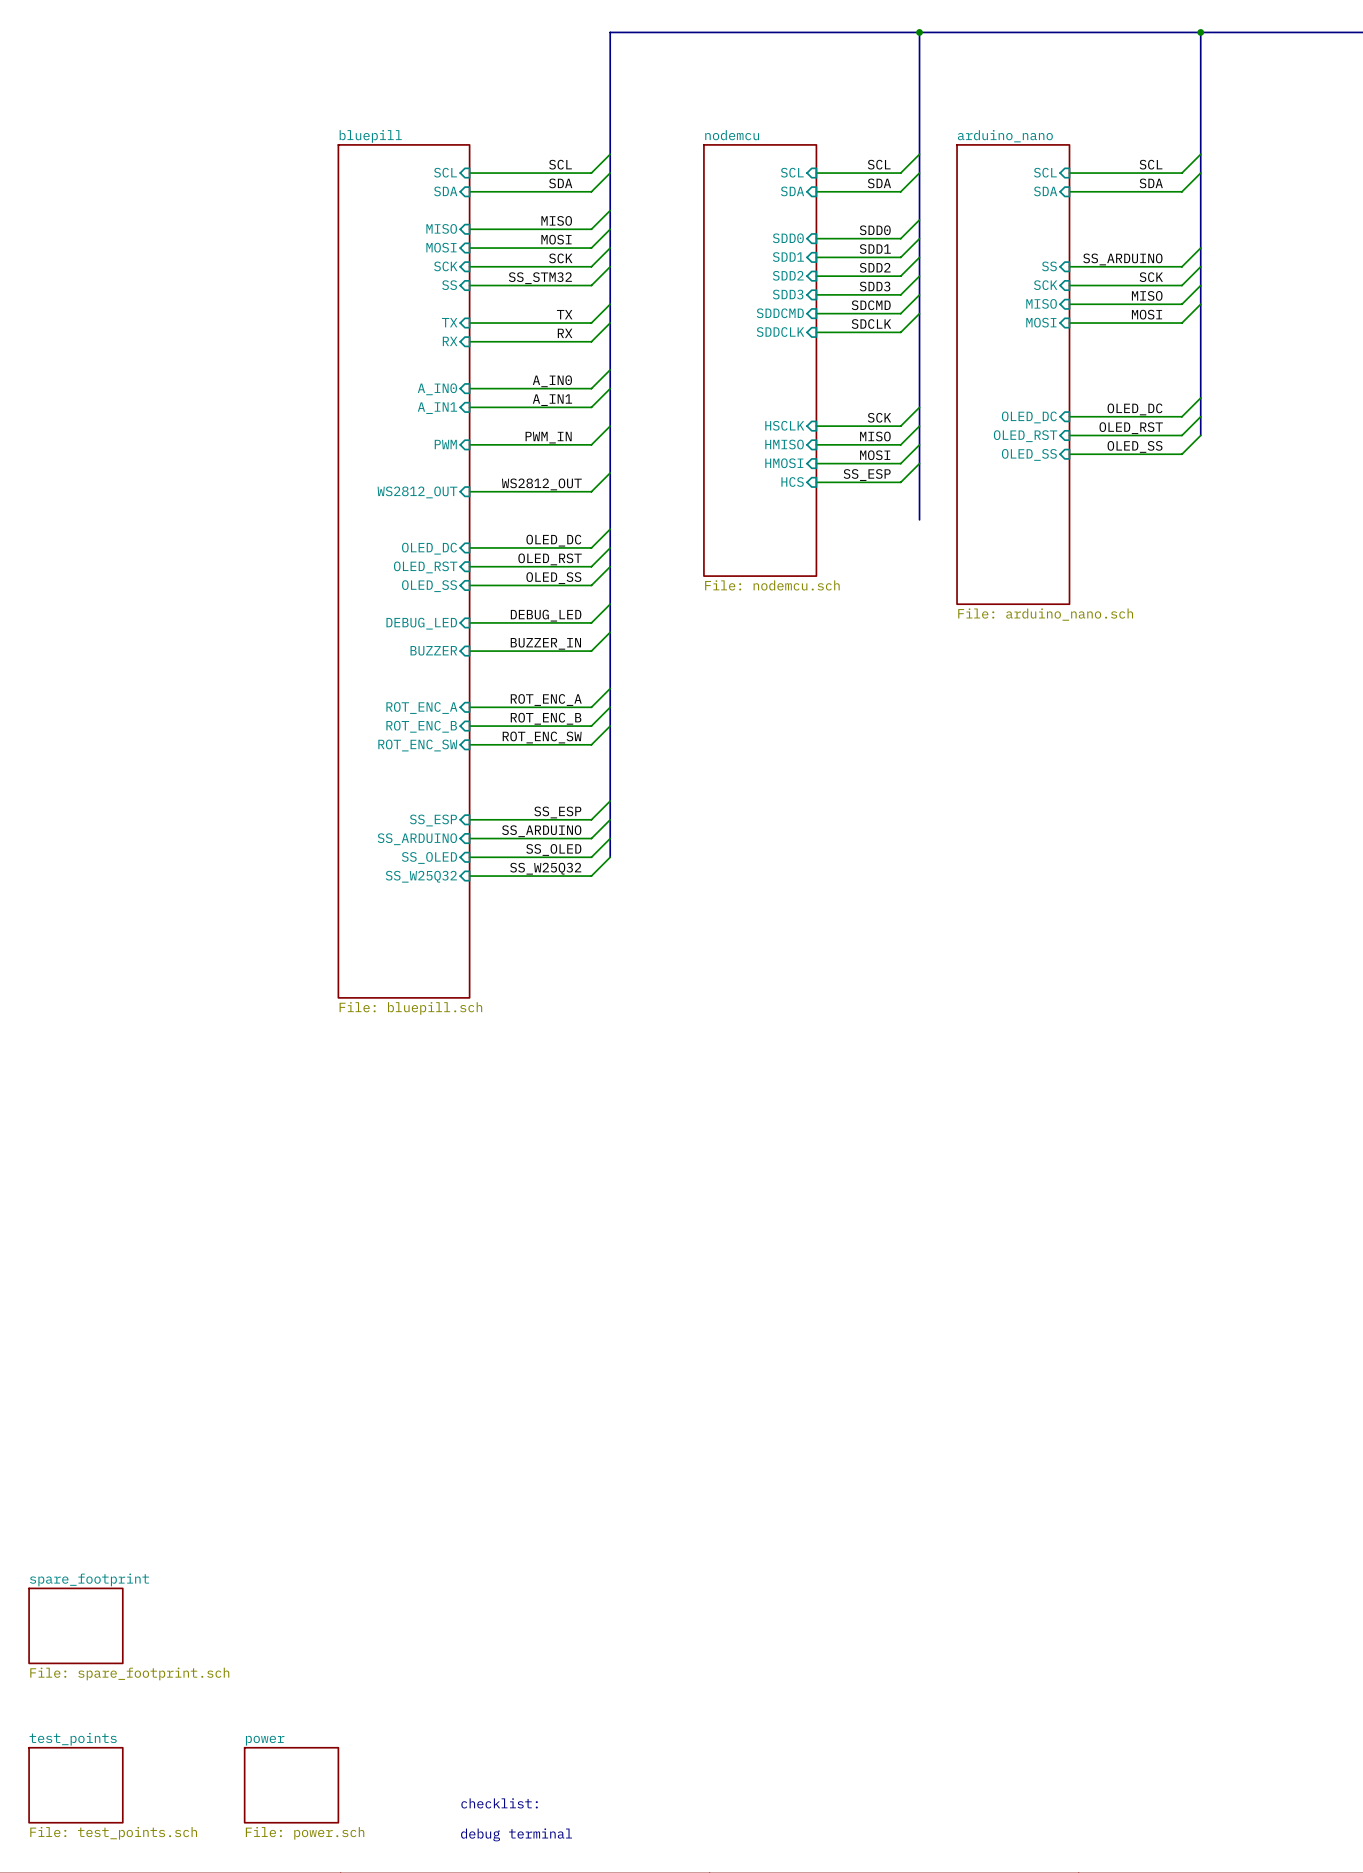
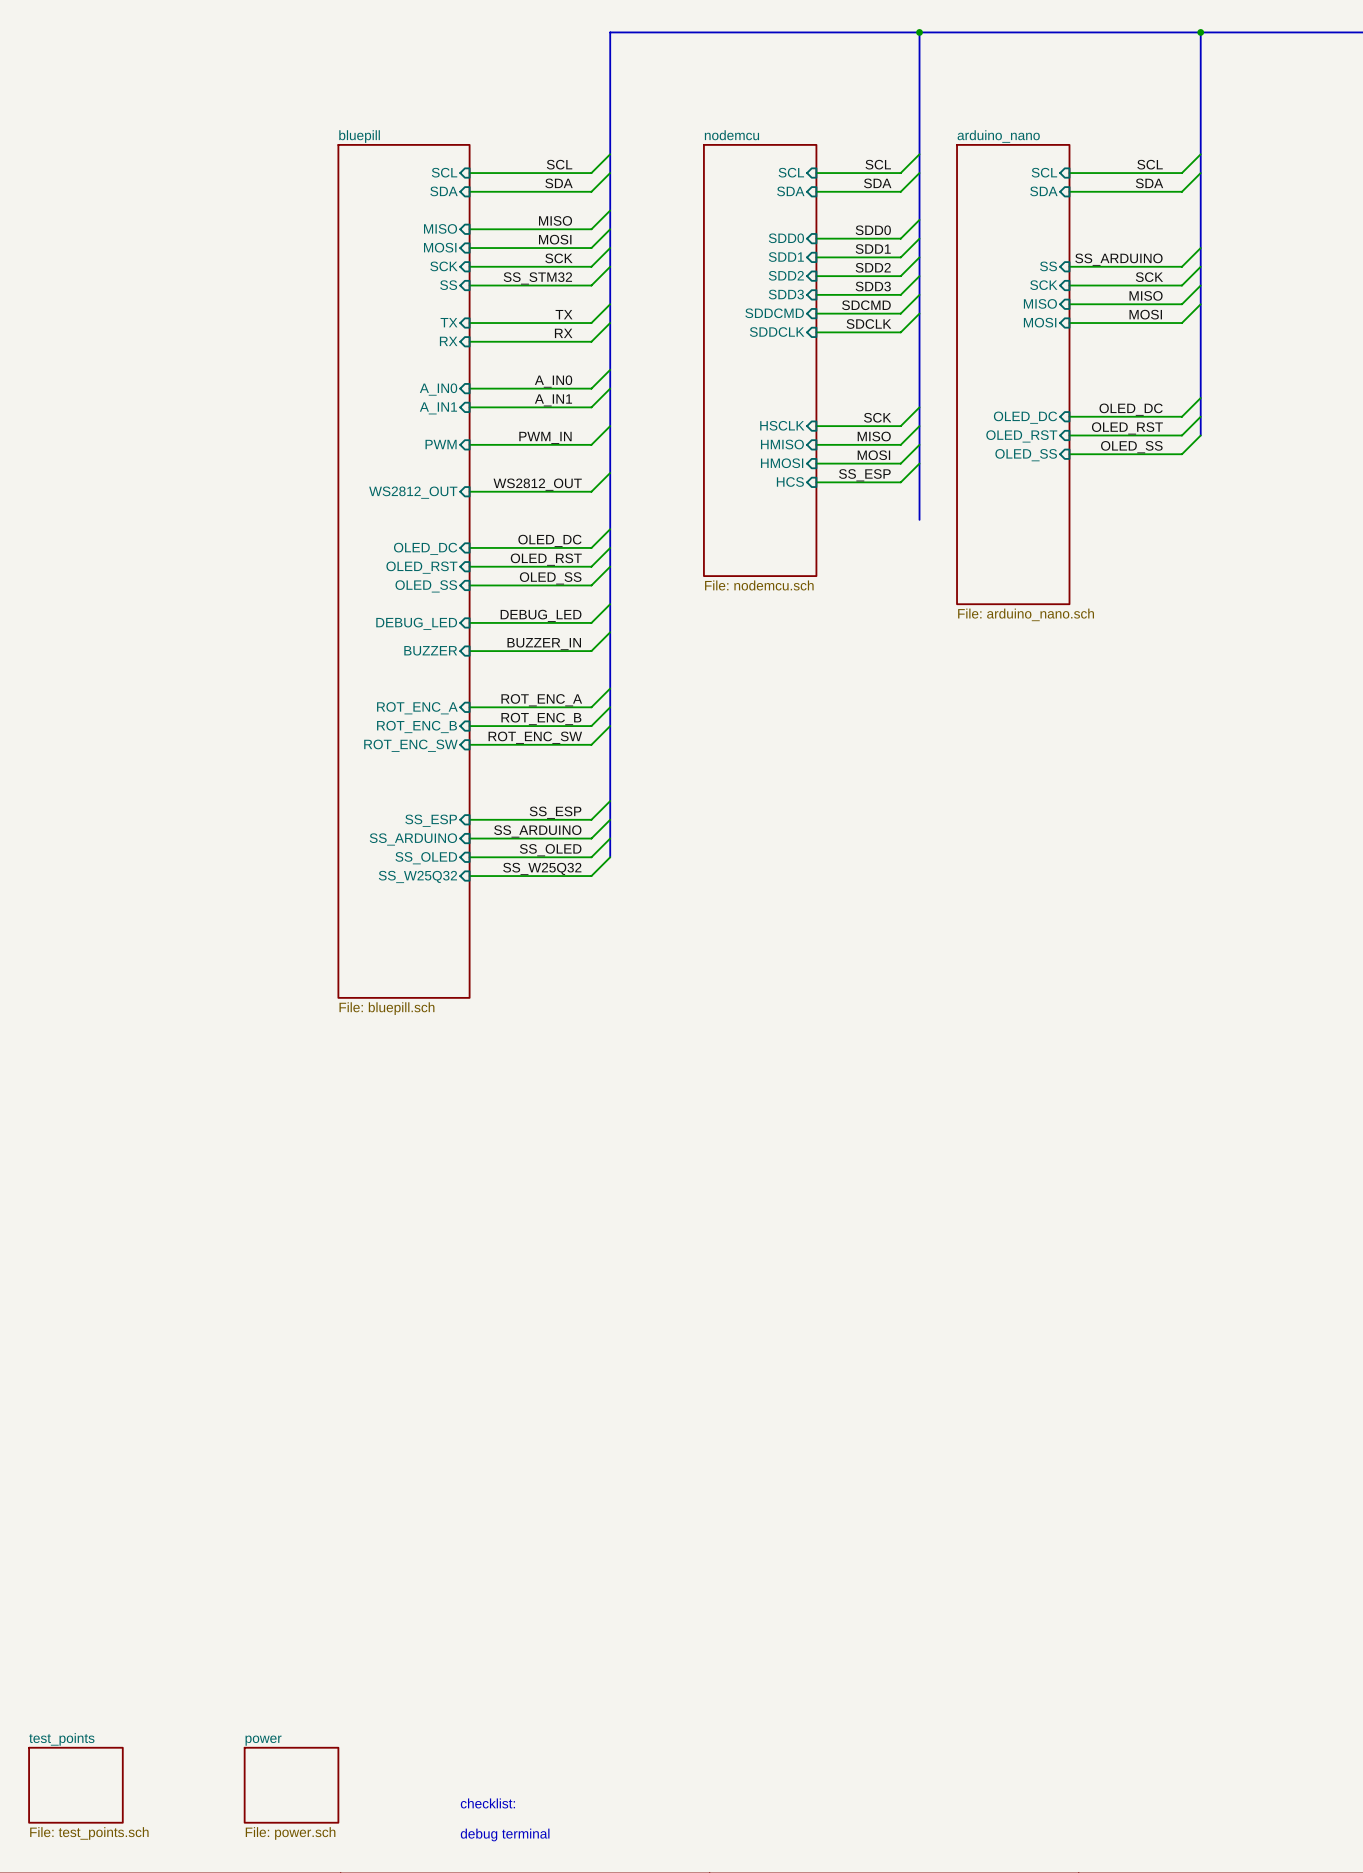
sheet spare_footprint: File: spare_footprint.sch (75, 1625) -> none

